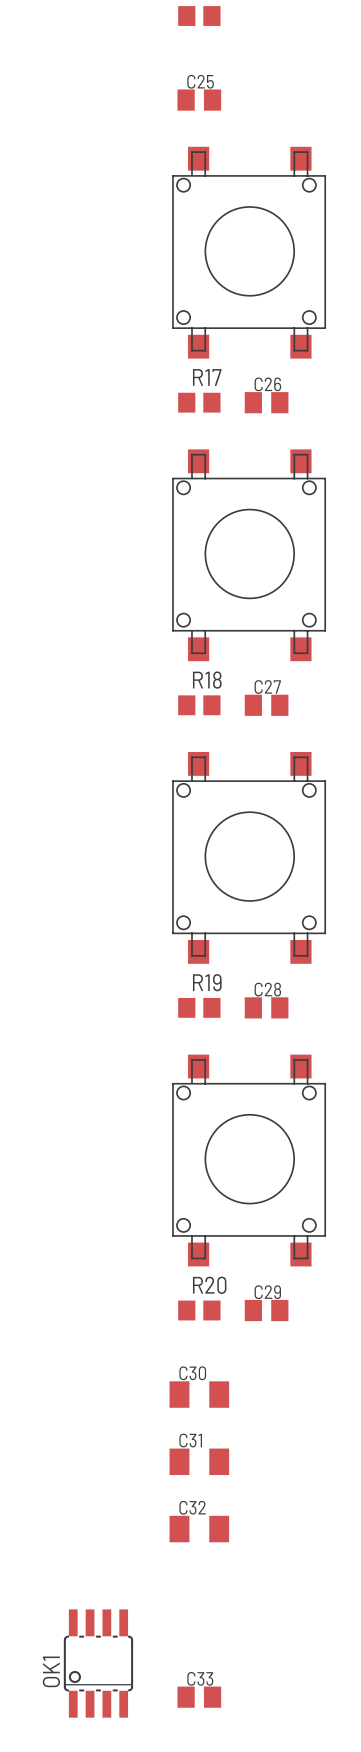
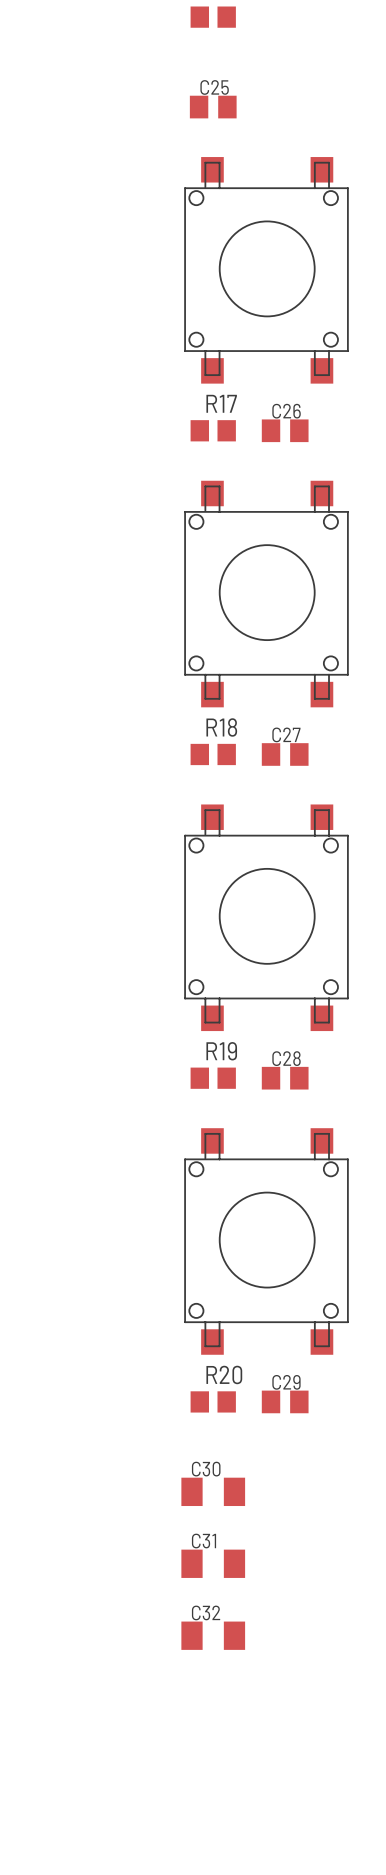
OK1: (98, 1663) -> none
C33: (199, 1697) -> none

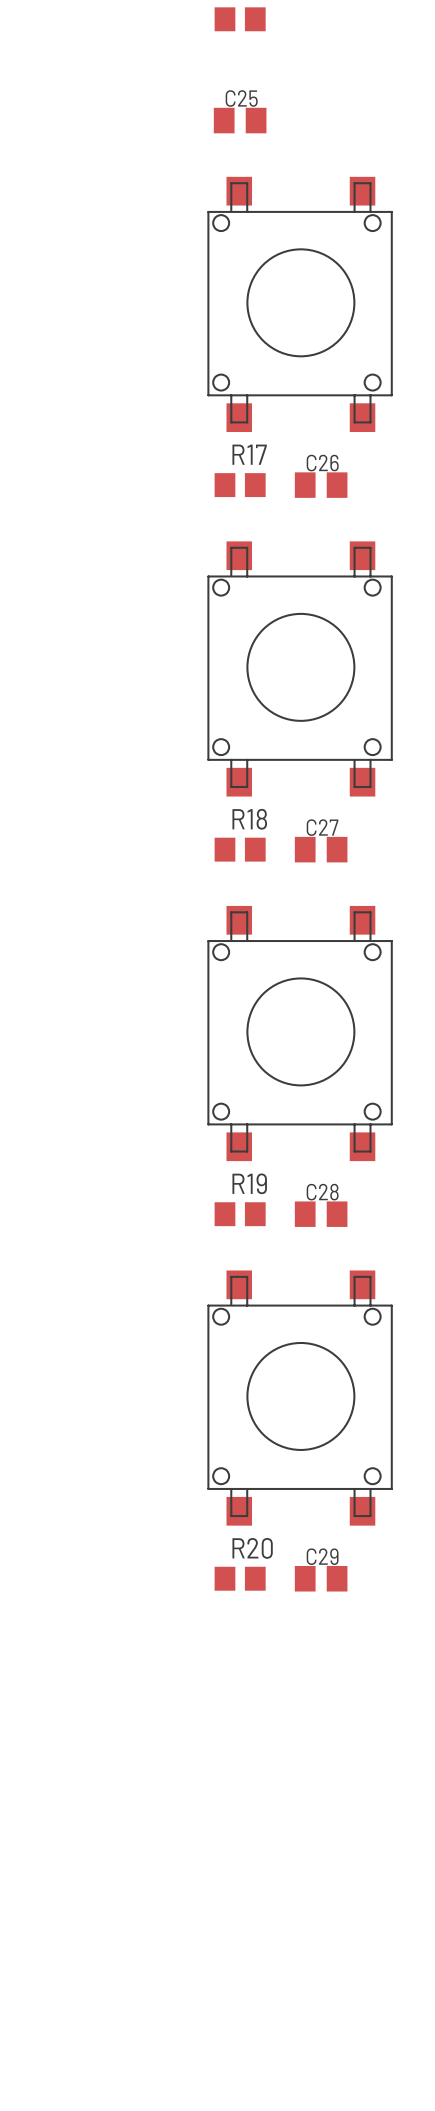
C30: (213, 1491) -> none
C31: (213, 1563) -> none
C32: (213, 1635) -> none

